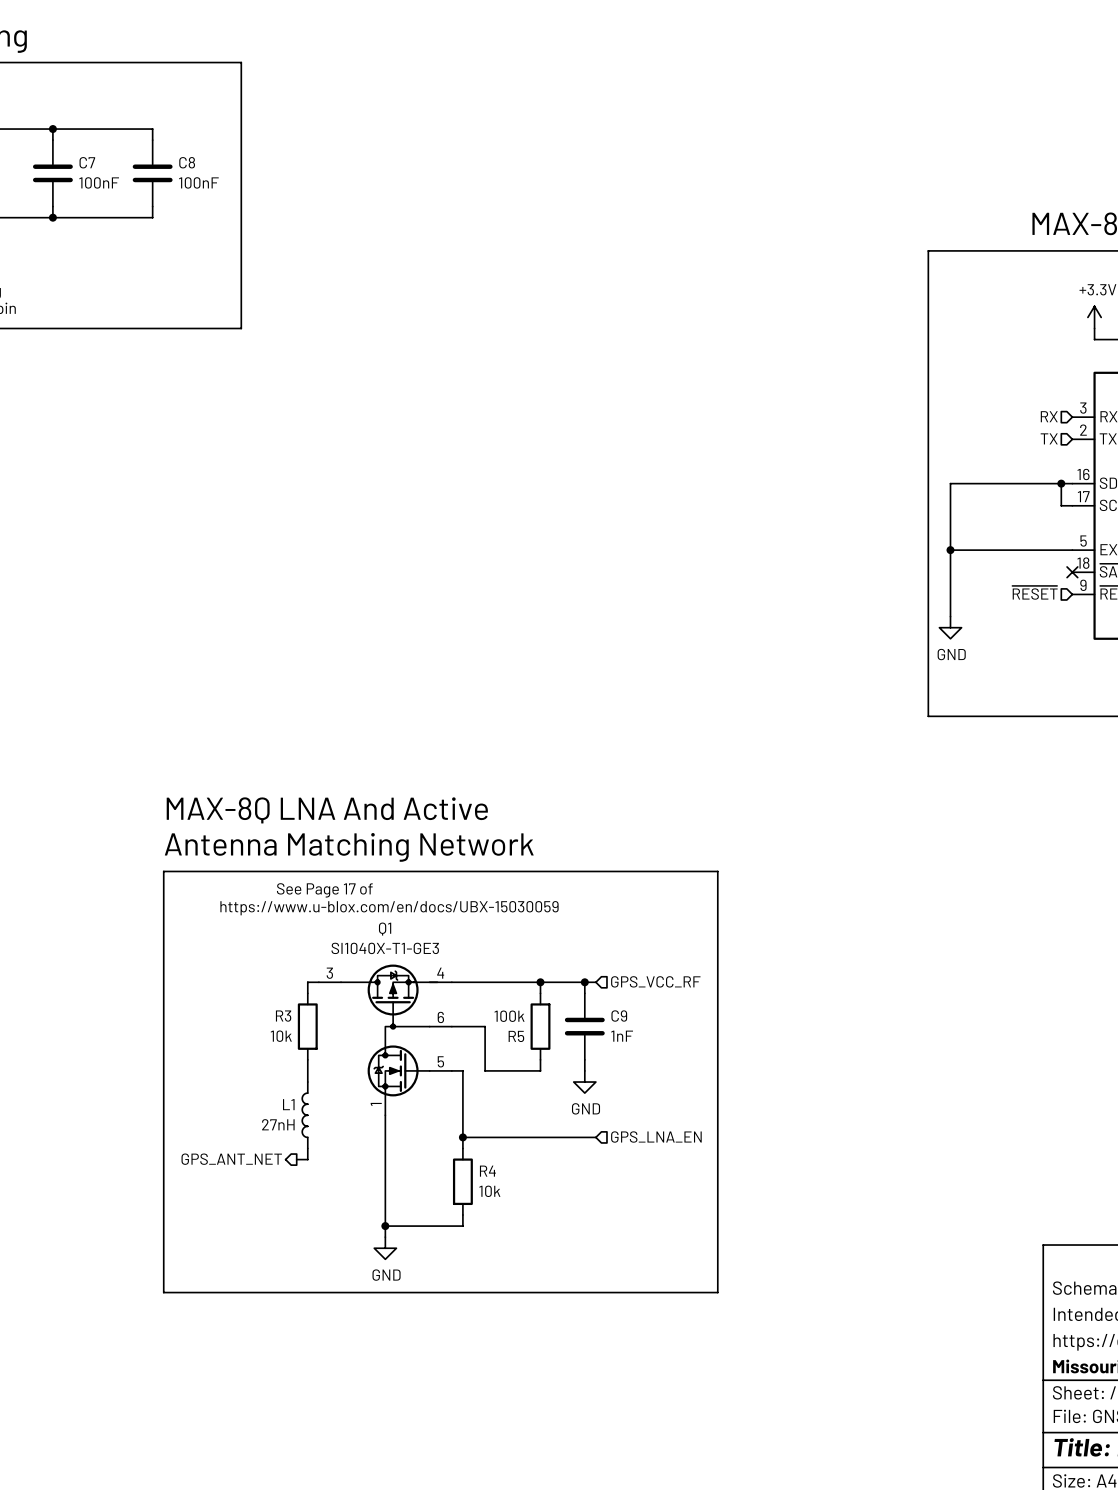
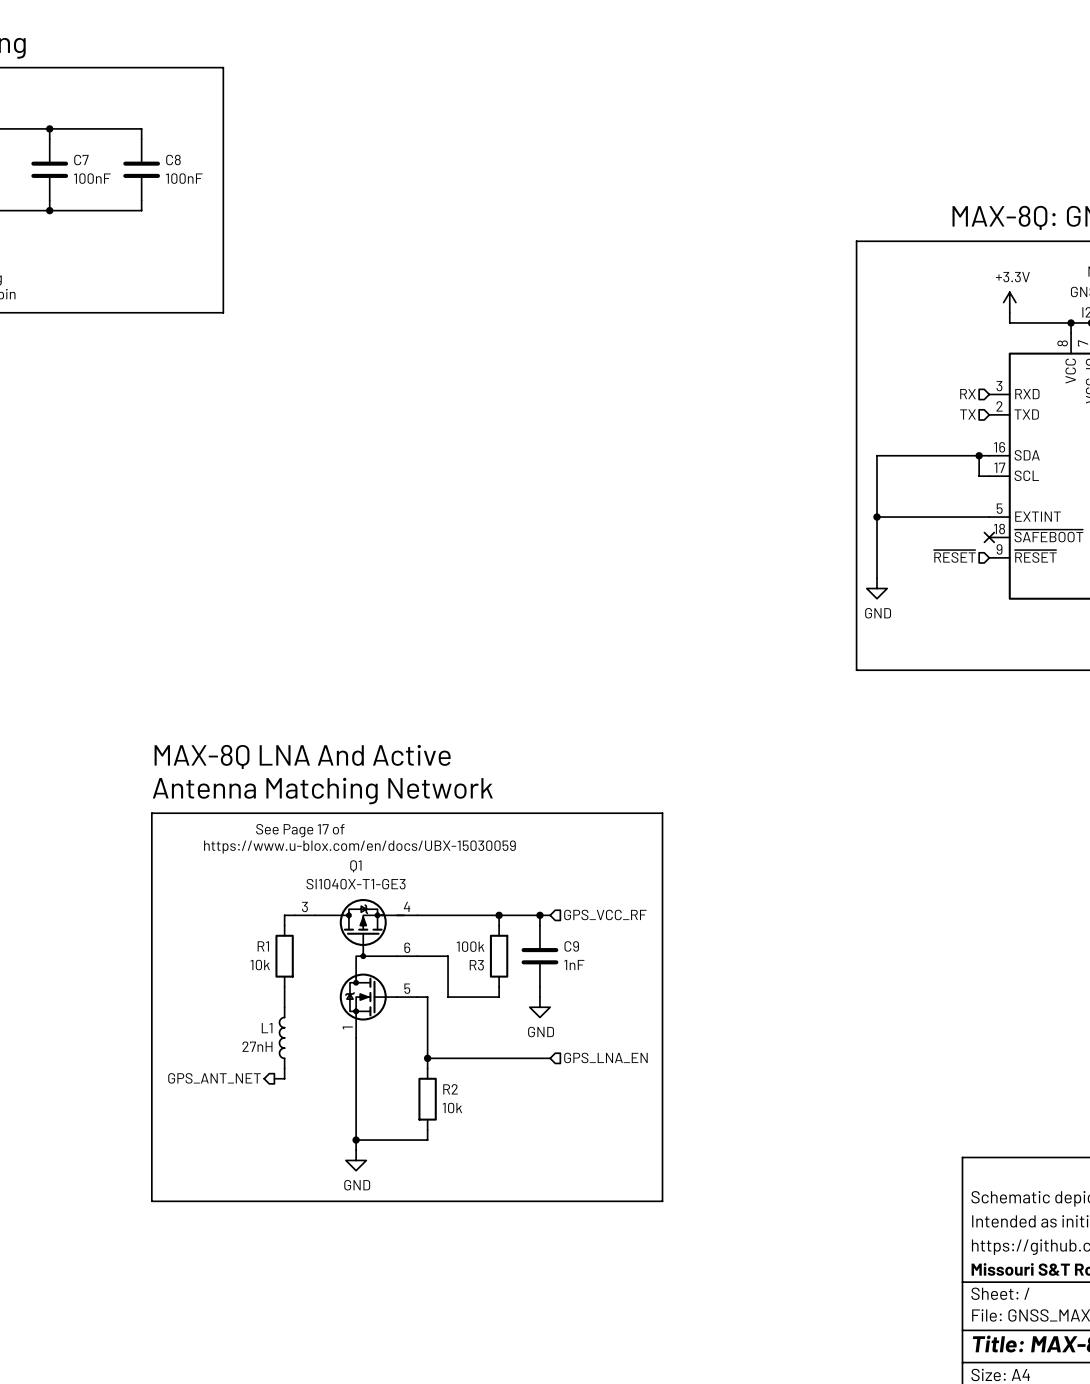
R3 name: R3 (283, 1016) -> R1 (263, 946)
R5 name: R5 (516, 1036) -> R3 (476, 965)
R4 name: R4 (487, 1171) -> R2 (450, 1089)

